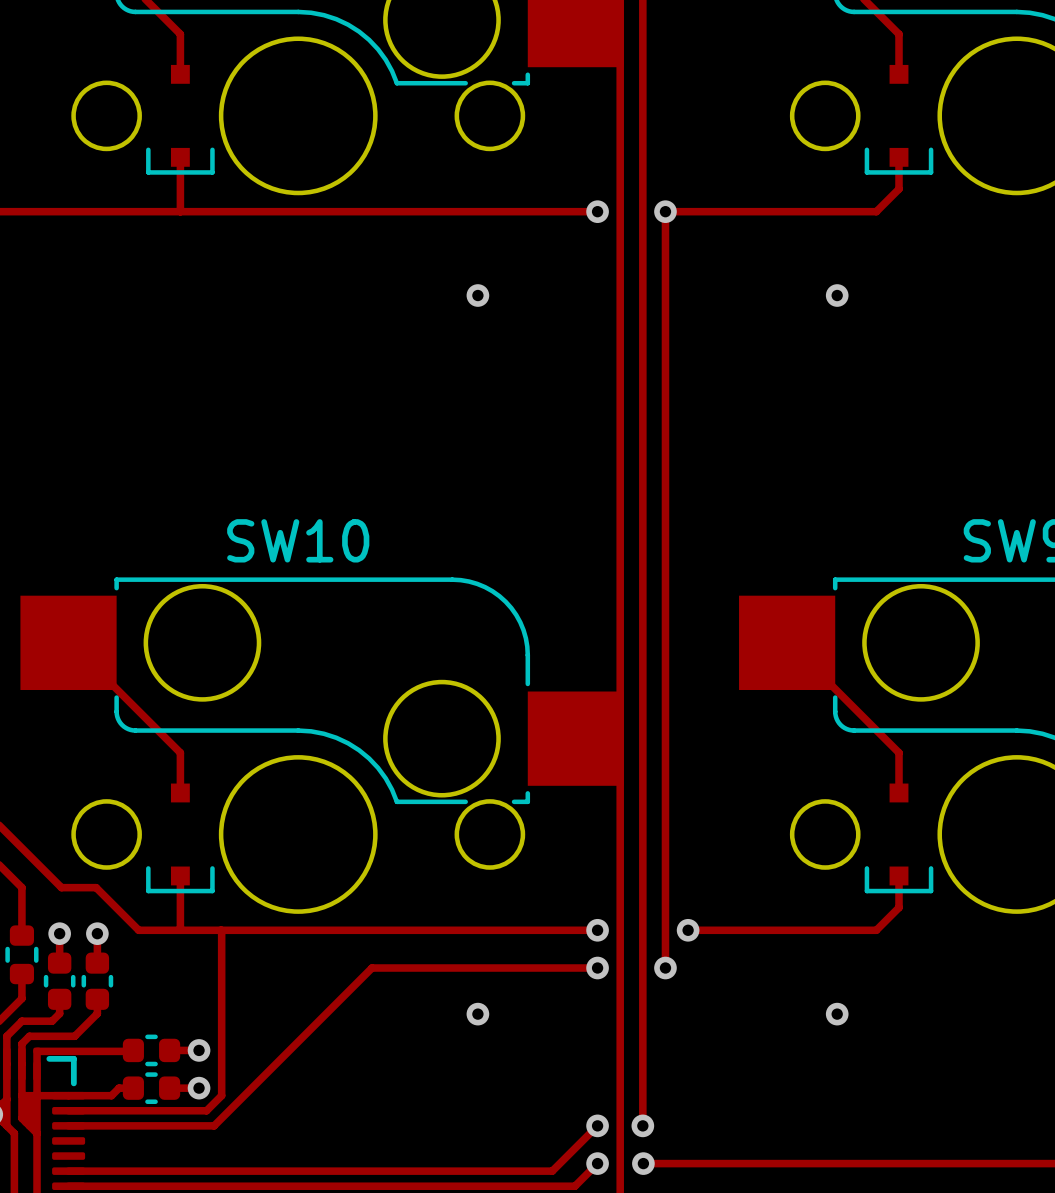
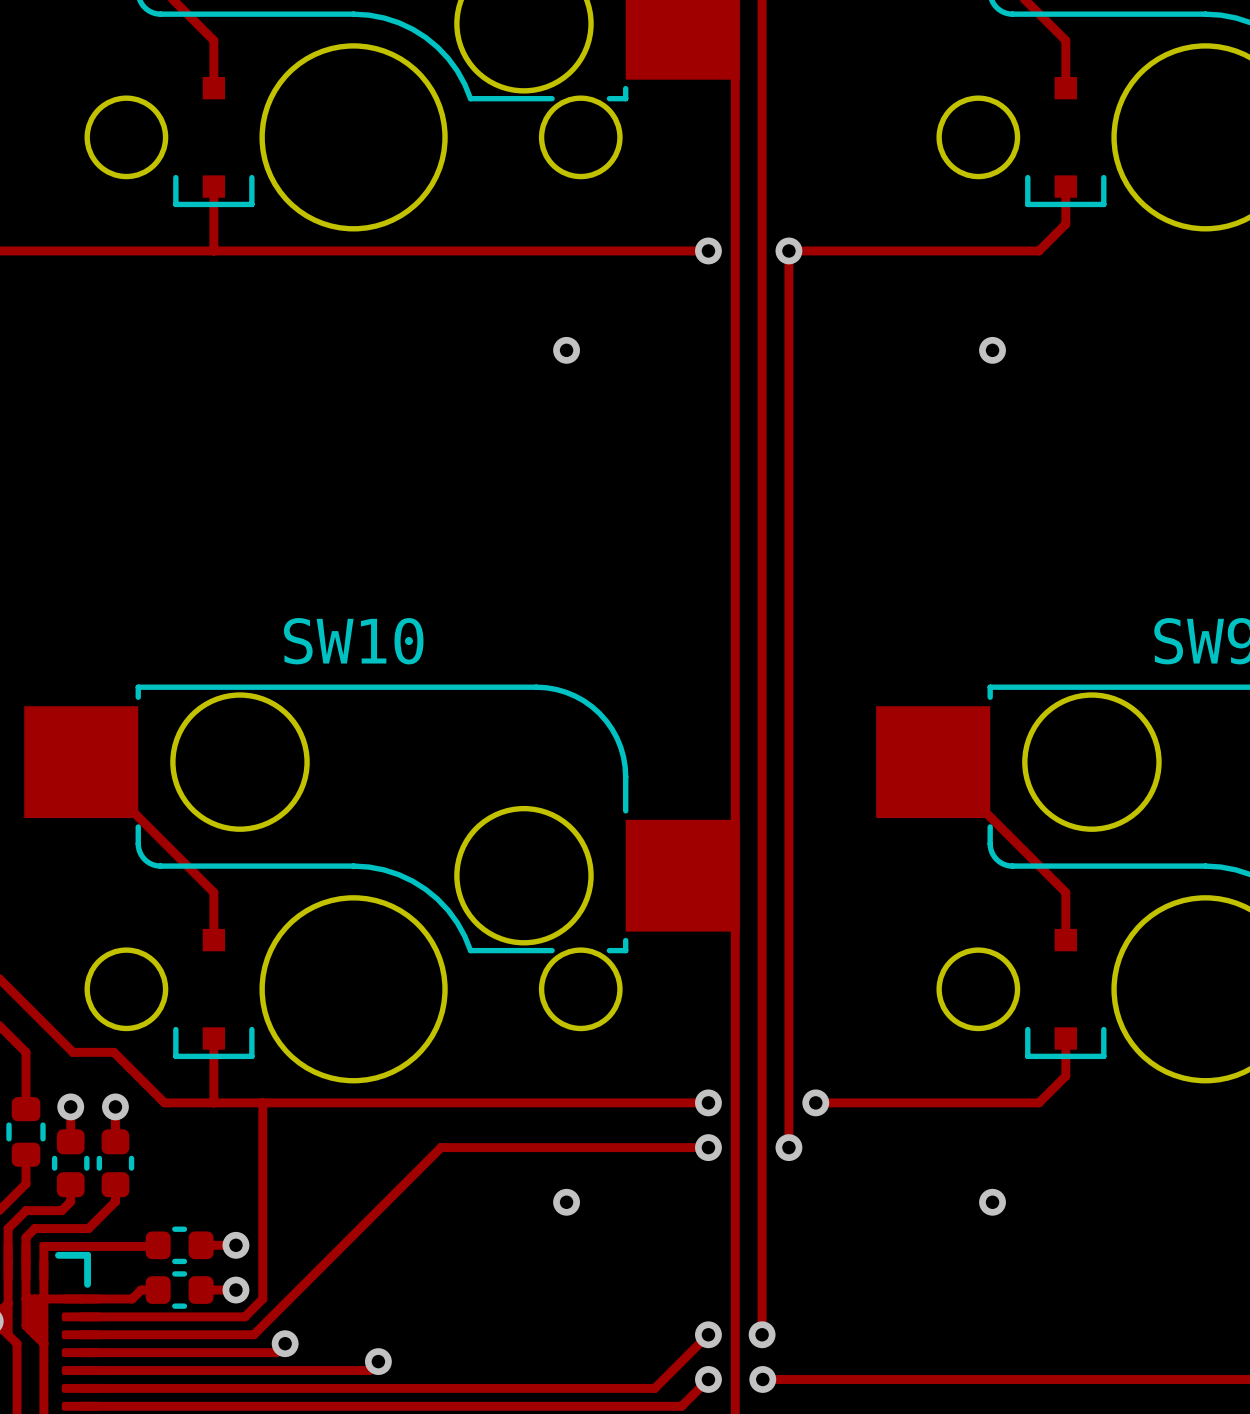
track: none -> (285, 1343) (276, 1352) (81, 1352)
via: none -> (285, 1343)
track: none -> (378, 1361) (369, 1370) (81, 1370)
via: none -> (378, 1361)

